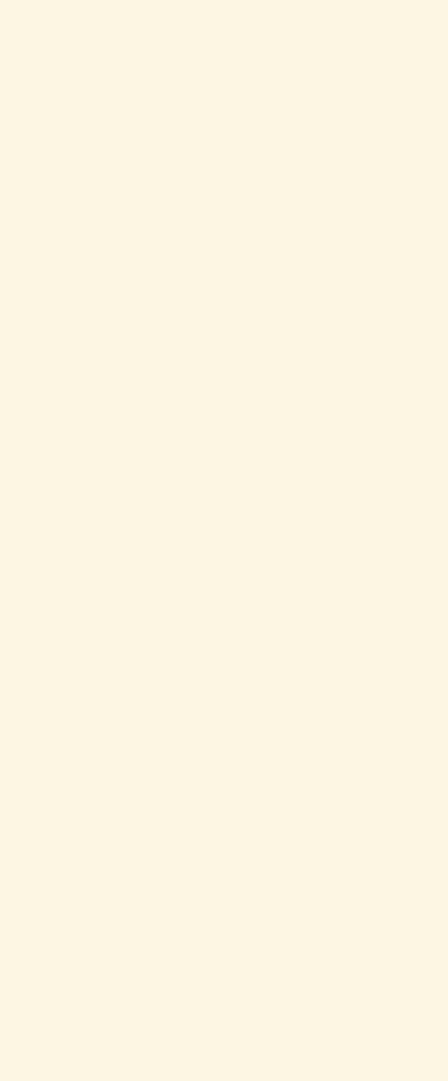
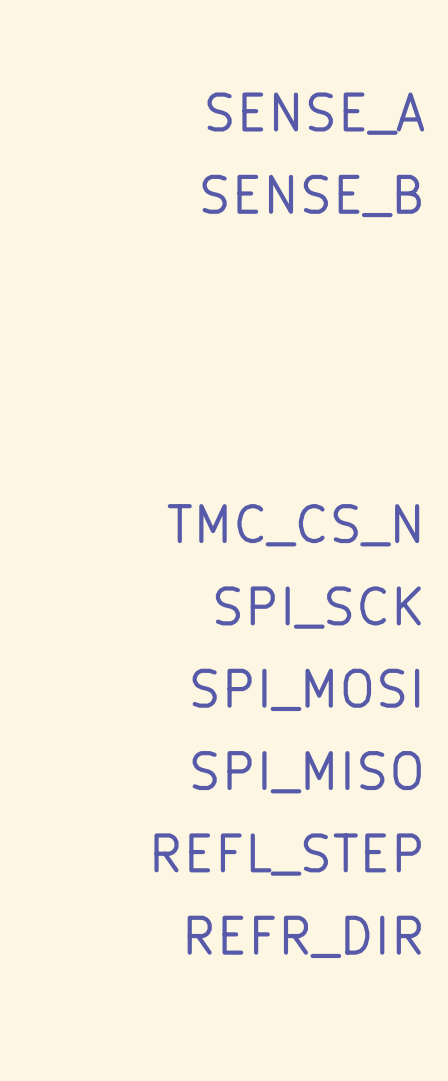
text: none -> SENSE_A (315, 113)
text: none -> SENSE_B (311, 195)
text: none -> TMC_CS_N (293, 525)
text: none -> SPI_SCK (318, 607)
text: none -> SPI_MOSI (305, 689)
text: none -> SPI_MISO (306, 772)
text: none -> REFL_STEP (287, 854)
text: none -> REFR_DIR (304, 936)

